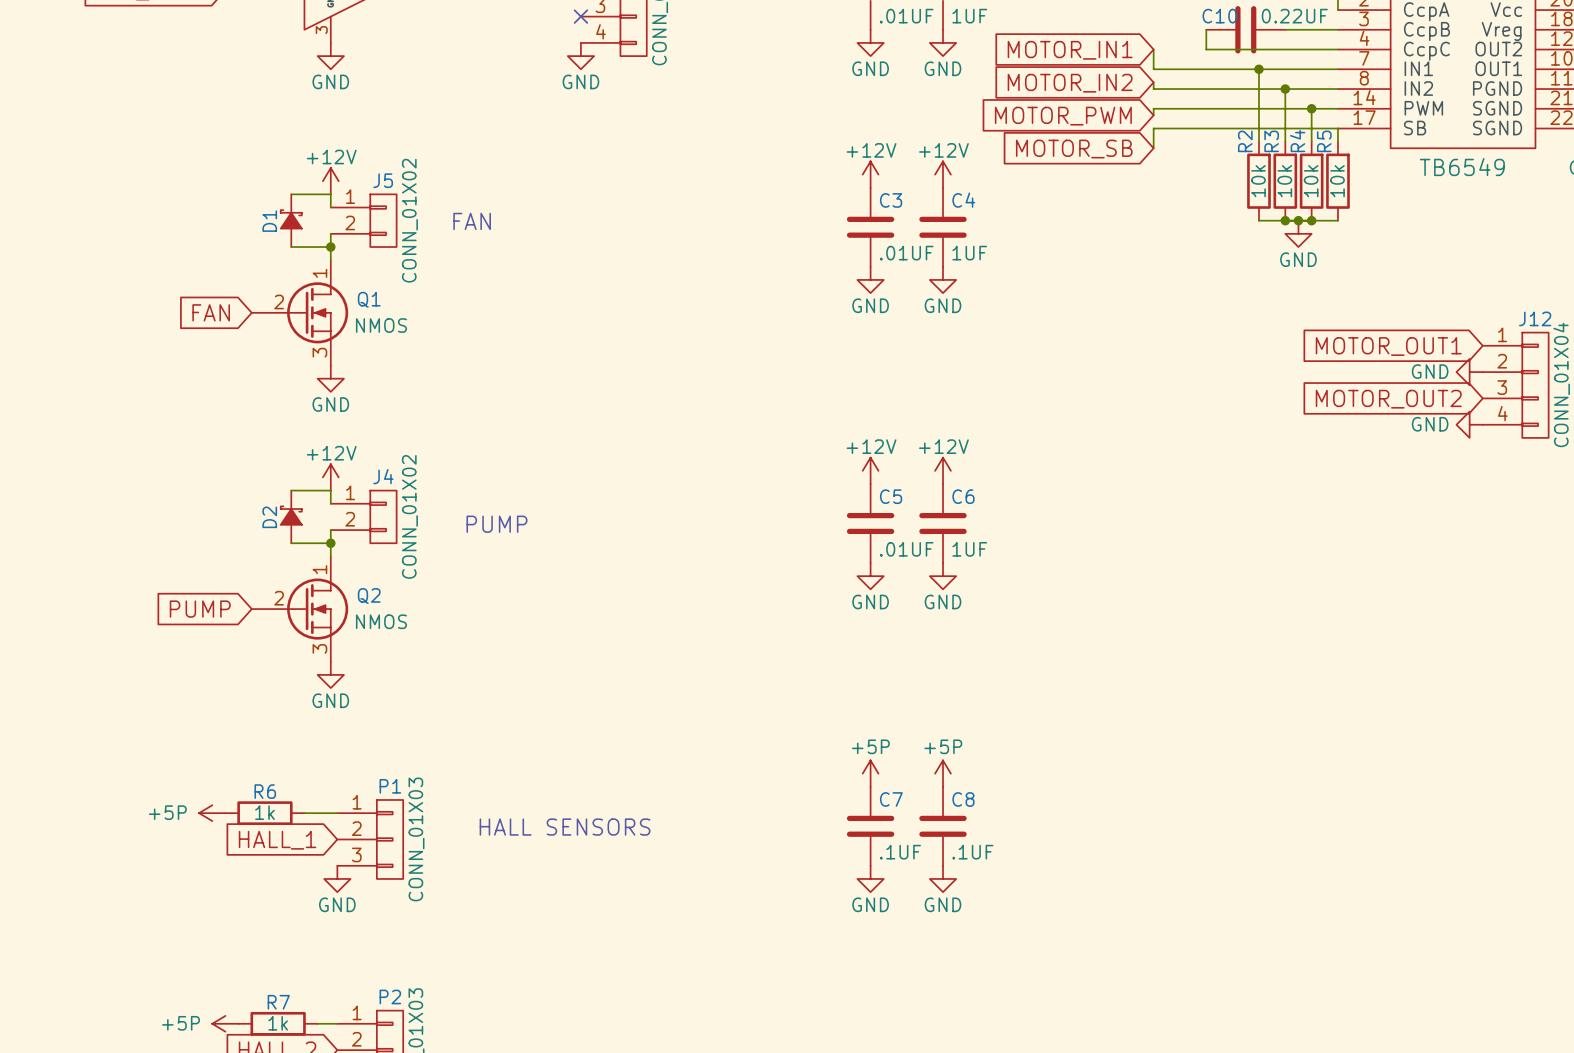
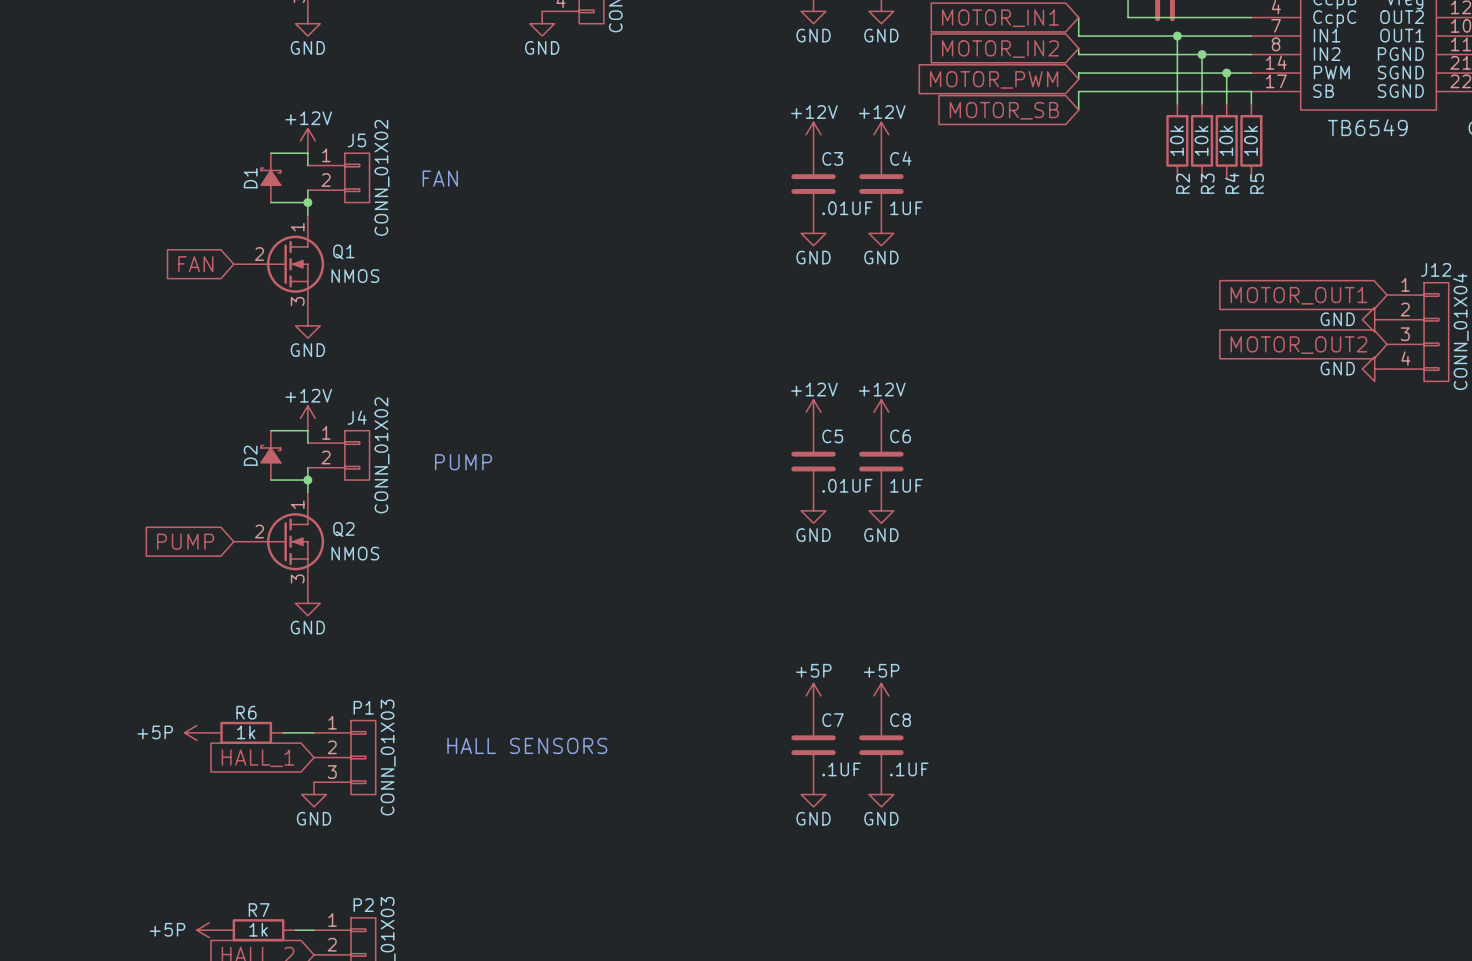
R2 name position: R2 (1245, 141) -> R2 (1183, 183)
R3 name position: R3 (1271, 141) -> R3 (1207, 183)
R4 name position: R4 (1297, 141) -> R4 (1232, 183)
R5 name position: R5 (1324, 141) -> R5 (1257, 183)
wire: (1258, 220) (1337, 220) -> none
junction: (1285, 220) -> none
junction: (1298, 220) -> none
junction: (1311, 220) -> none
power symbol: GND (1298, 233) -> none

